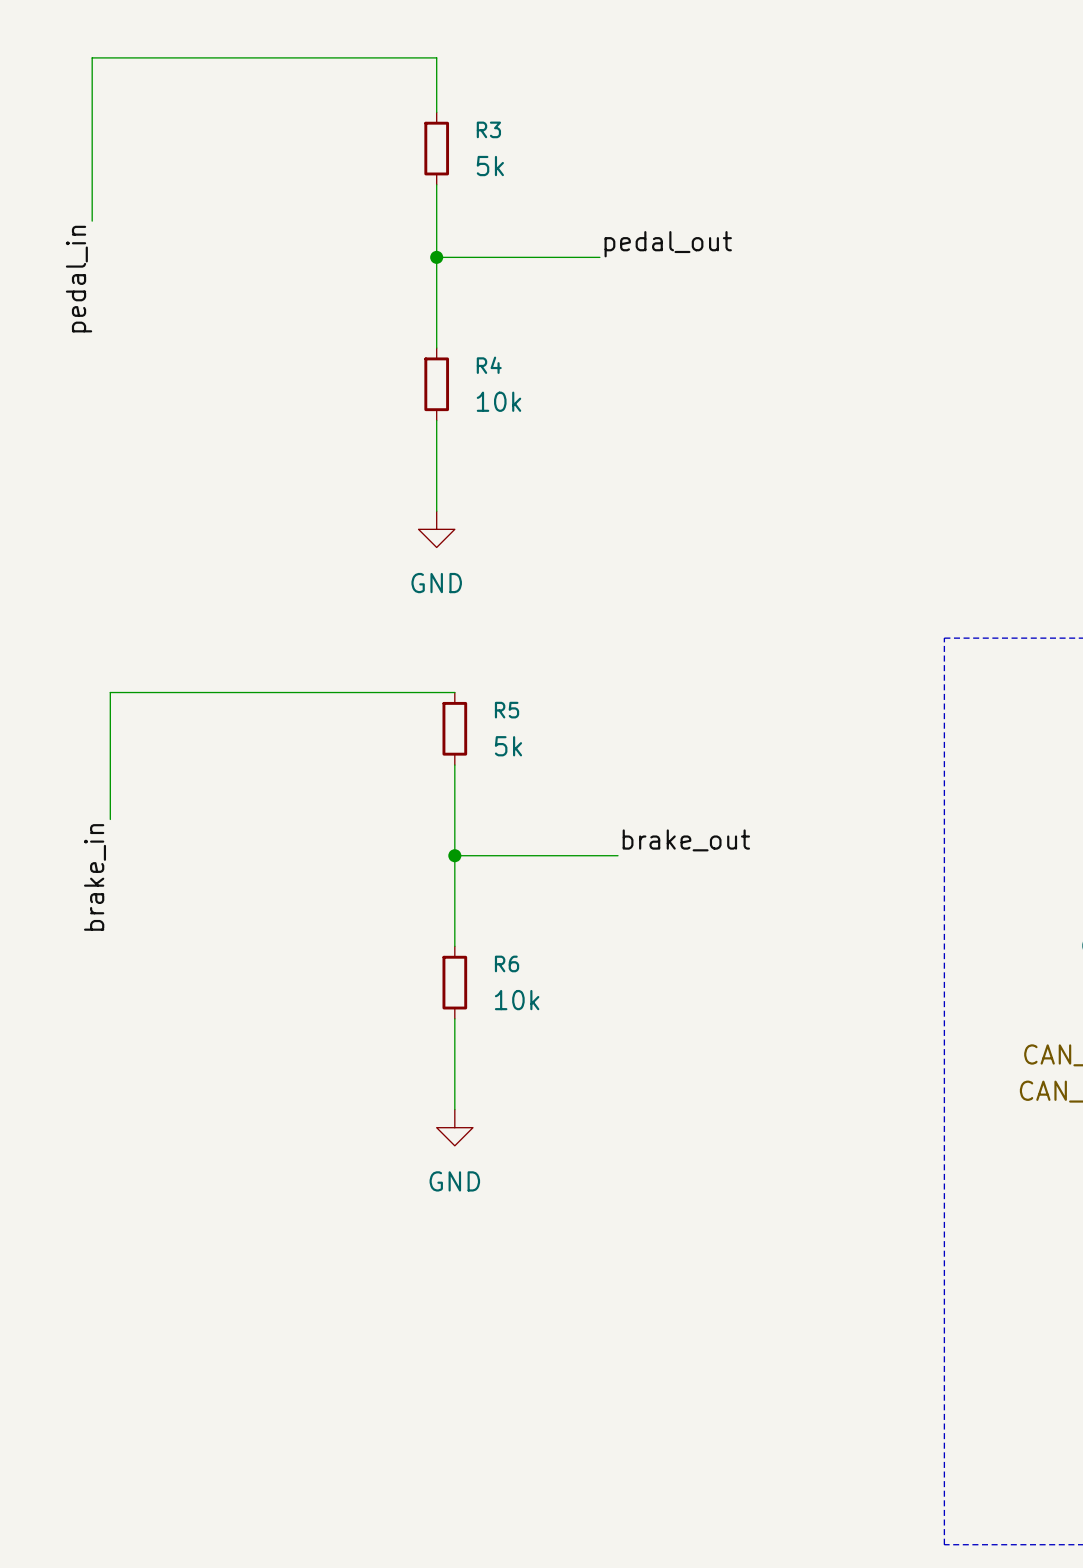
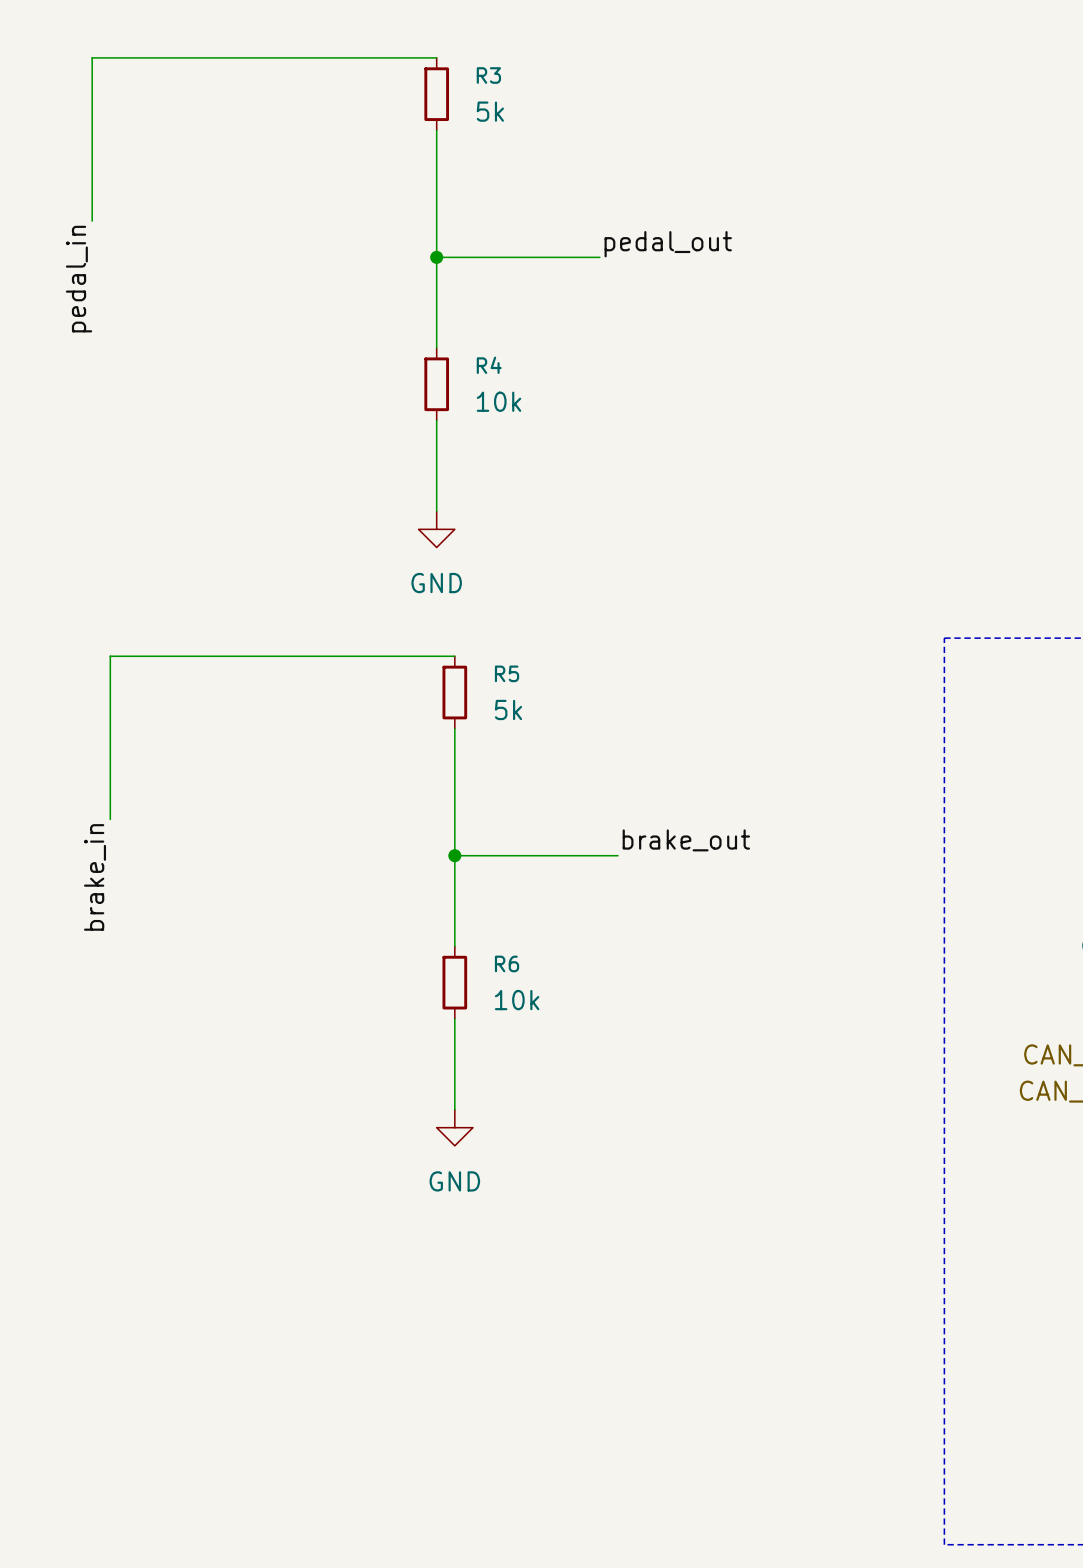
wire: (436, 57) (436, 112) -> (436, 130) (436, 184)
R3 position: (436, 148) -> (436, 94)
wire: (110, 692) (454, 692) -> (110, 692) (110, 656) (454, 656)
wire: none -> (454, 728) (454, 765)
R5 position: (454, 728) -> (454, 692)

